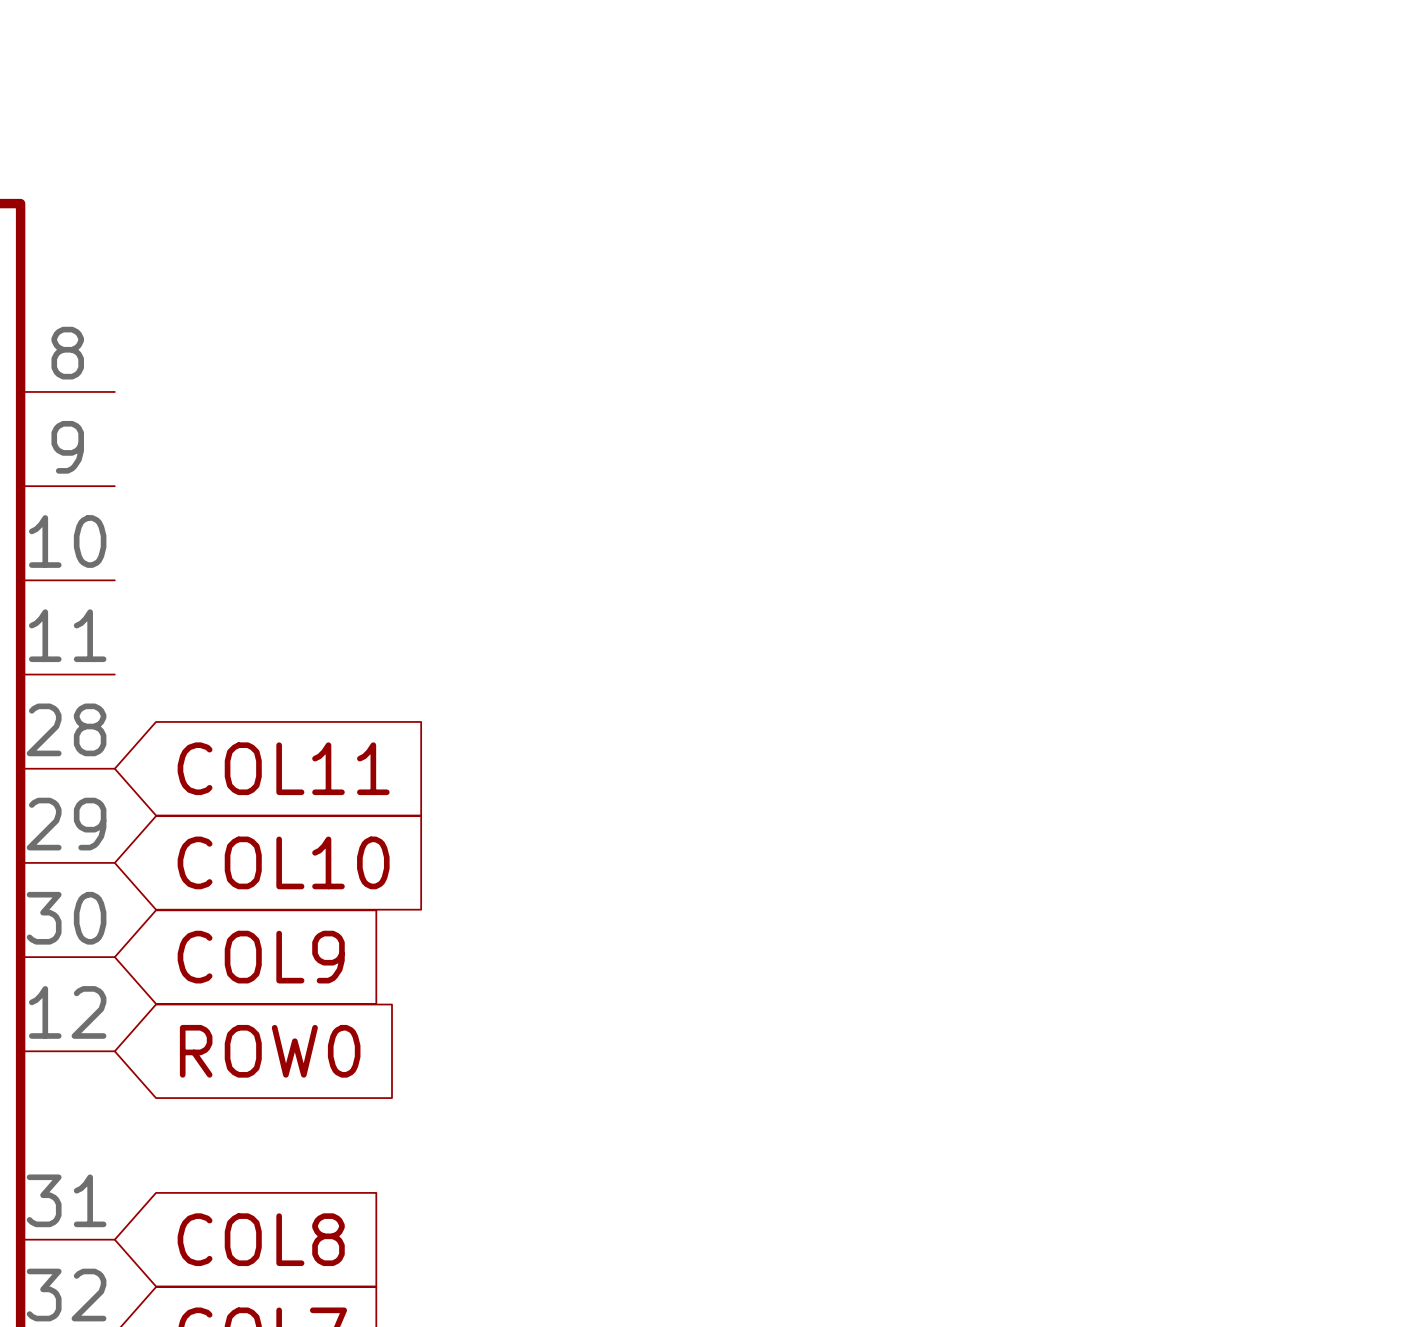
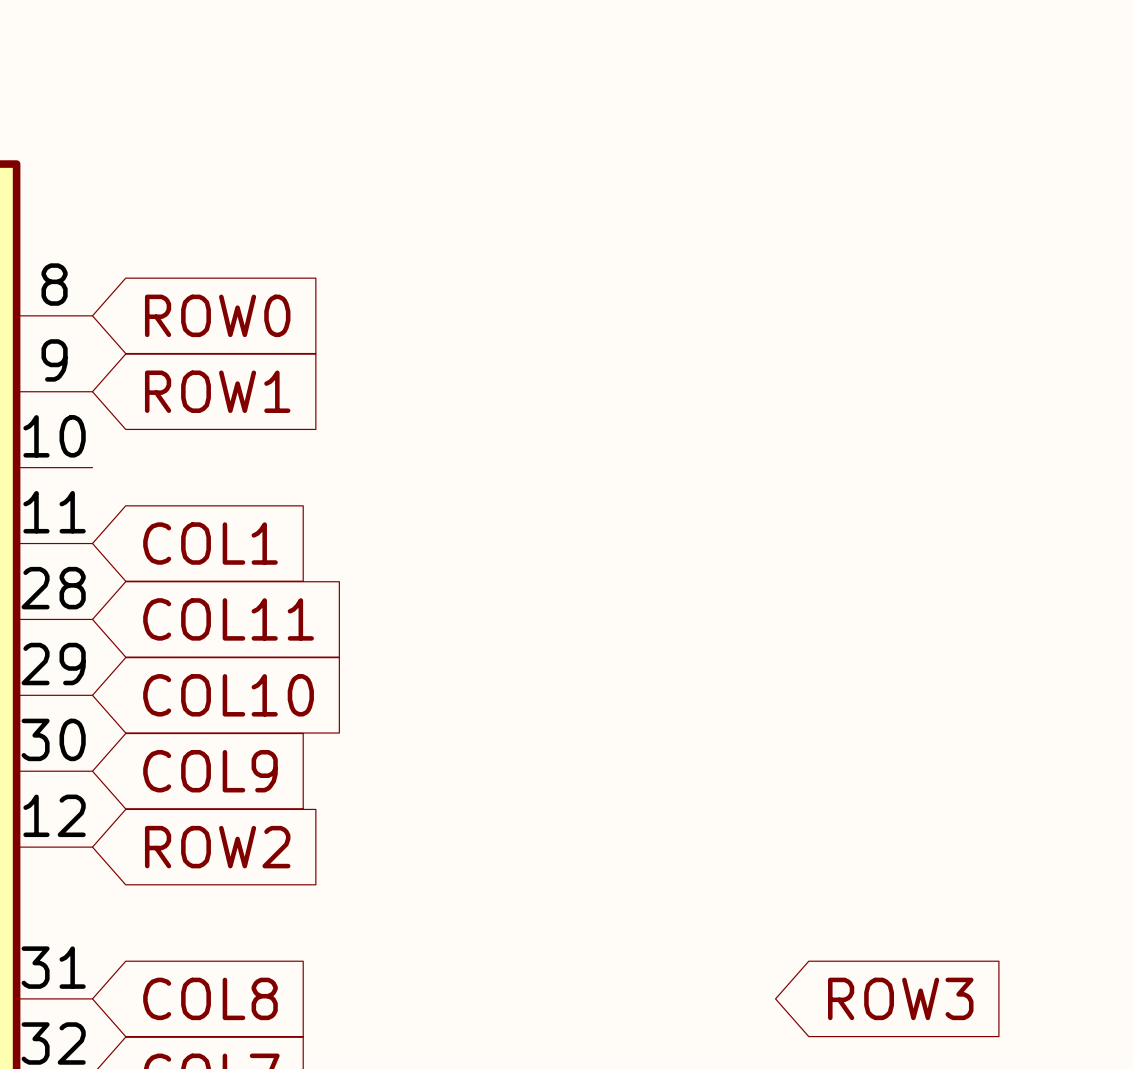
global label: none -> ROW0 (217, 315)
global label: none -> ROW1 (217, 391)
global label: none -> COL1 (210, 543)
global label: ROW0 (270, 1051) -> ROW2 (217, 847)
global label: none -> ROW3 (900, 998)

